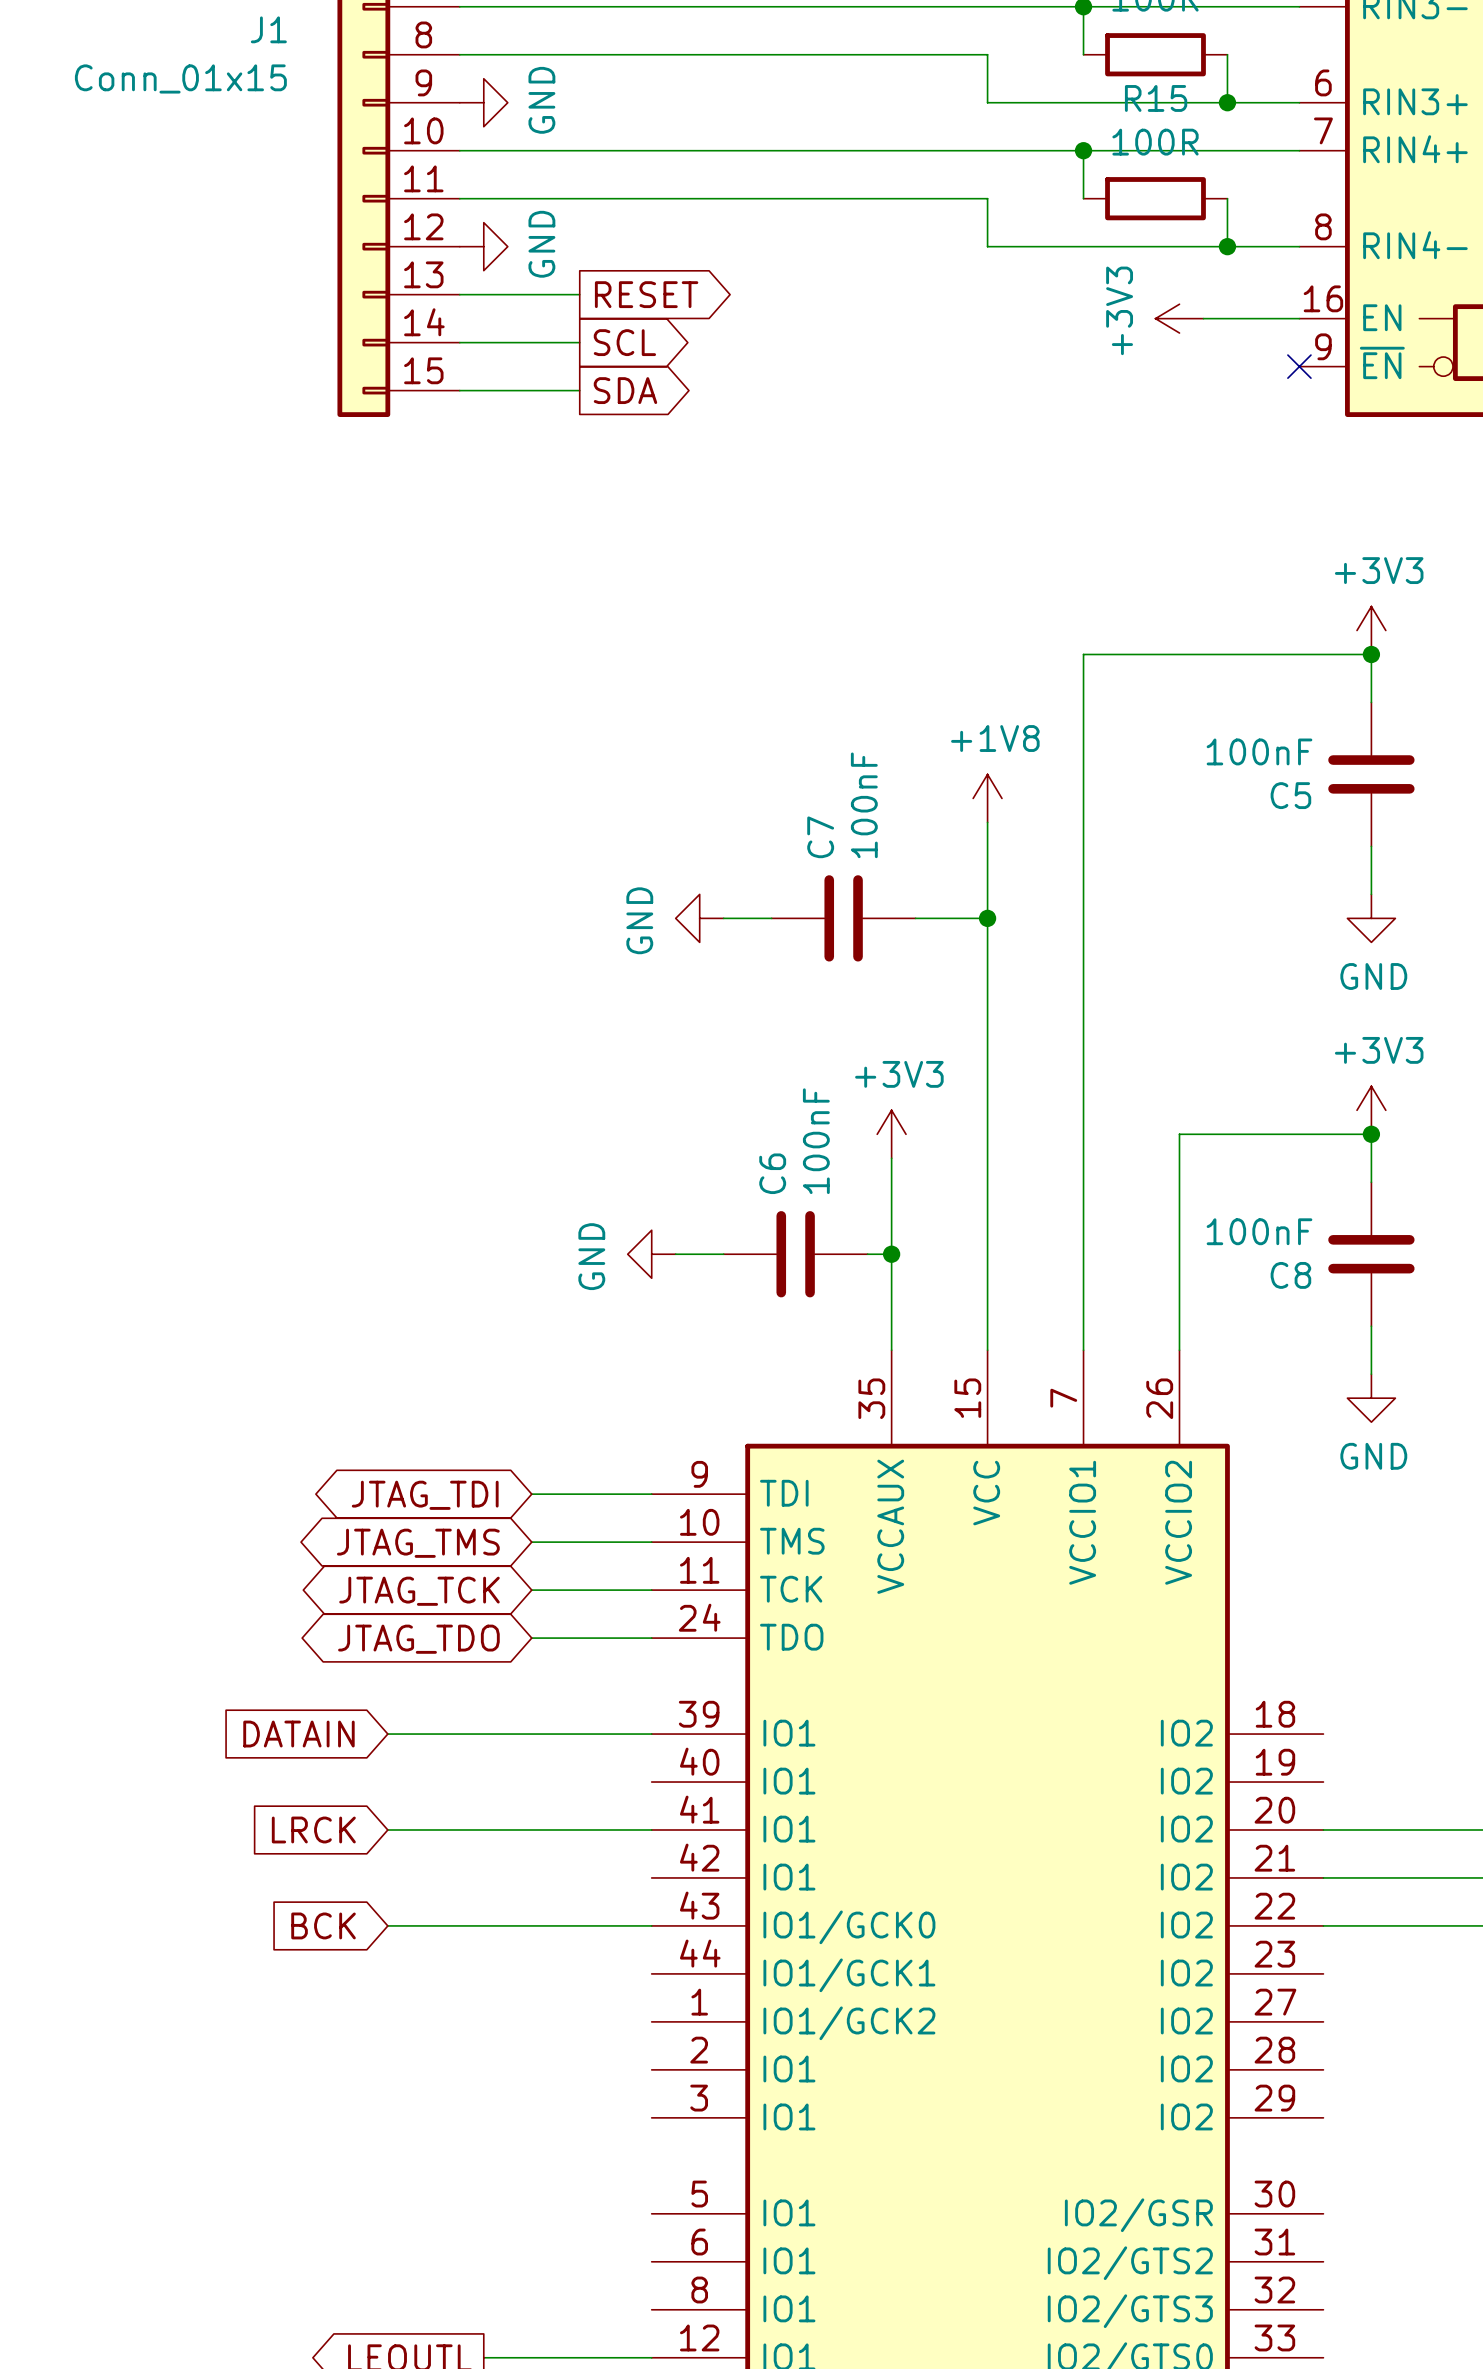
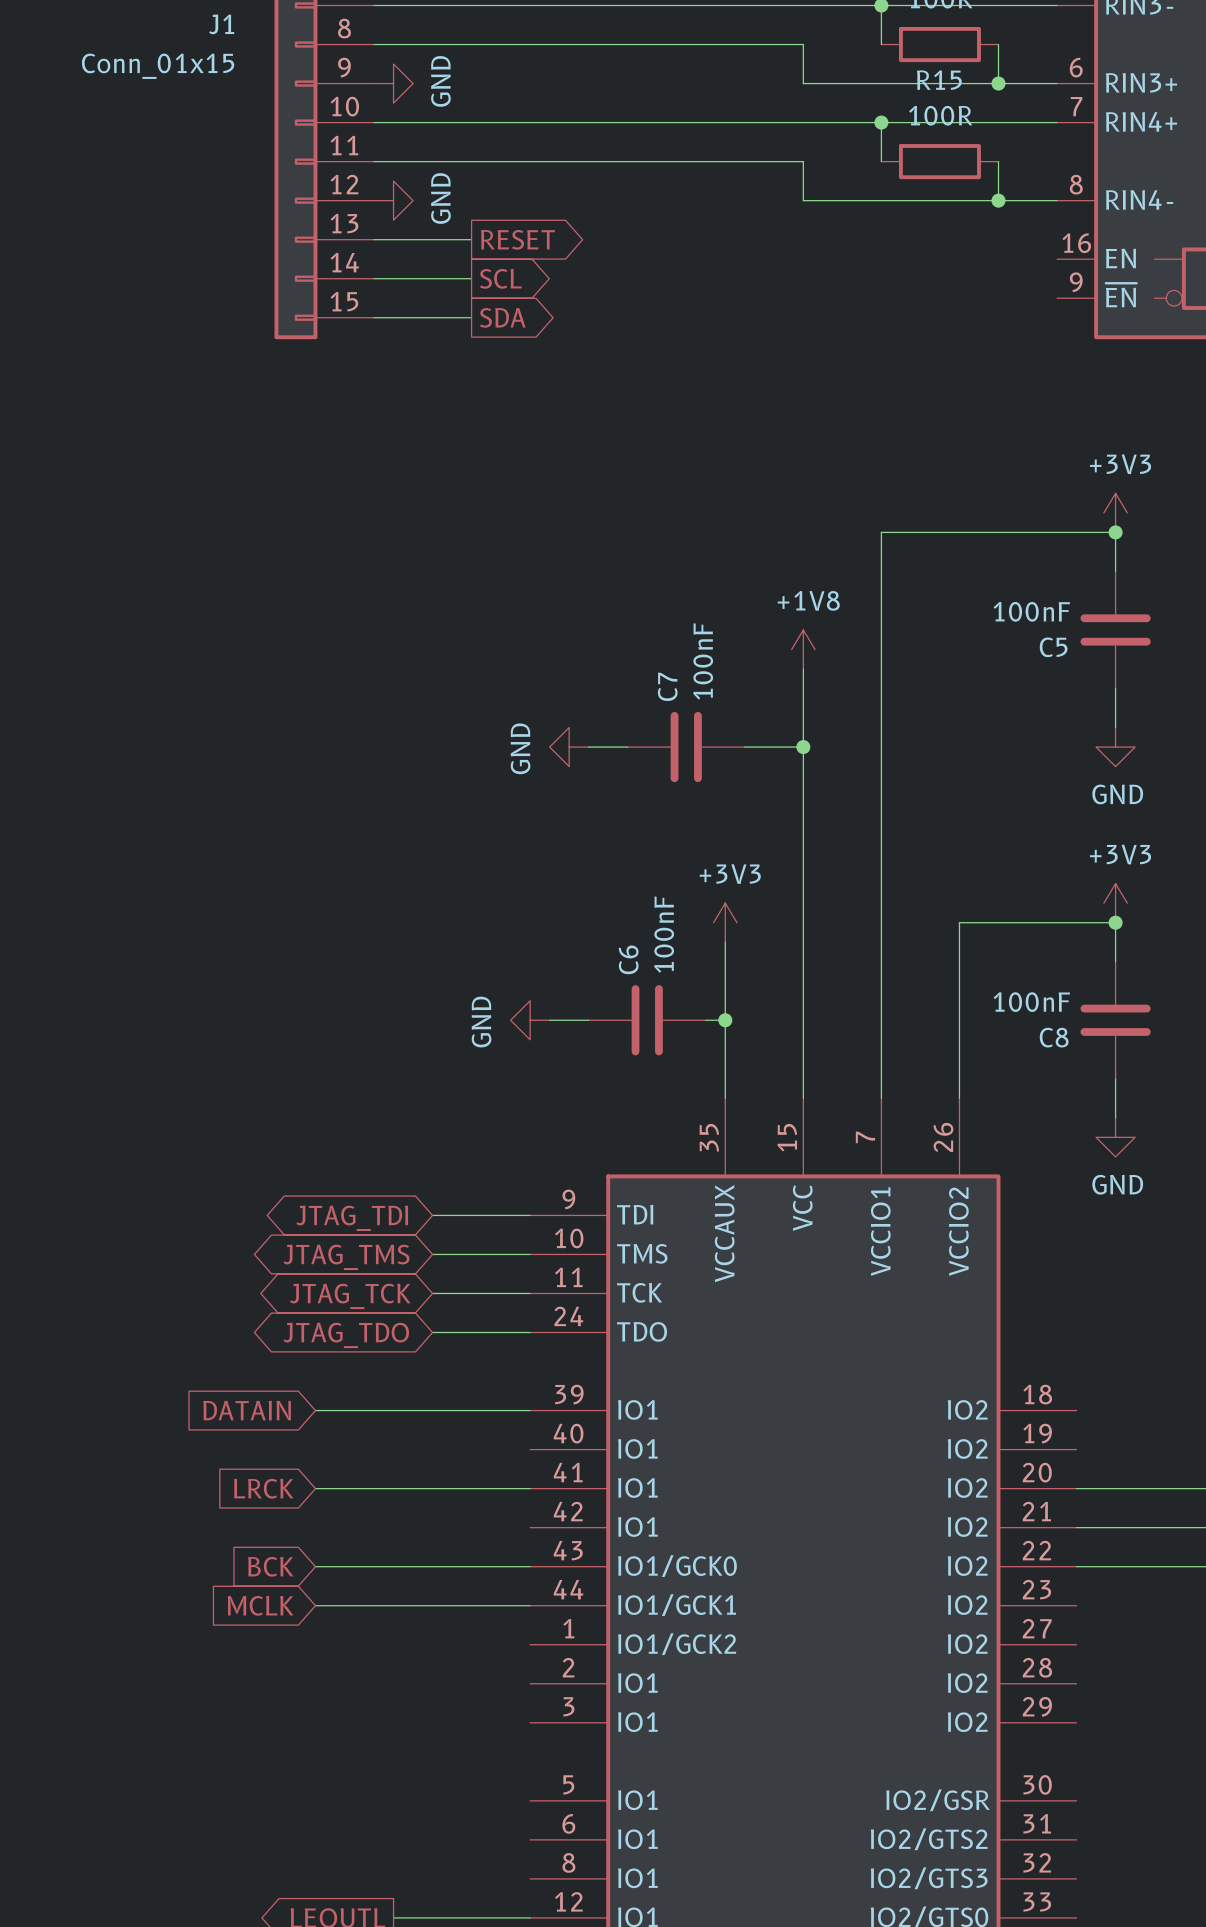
power symbol: +3V3 (1179, 318) -> none
wire: (1203, 318) (1299, 318) -> none
no-connect mark: (1299, 366) -> none
global label: none -> MCLK (260, 1605)
wire: none -> (315, 1605) (530, 1605)

